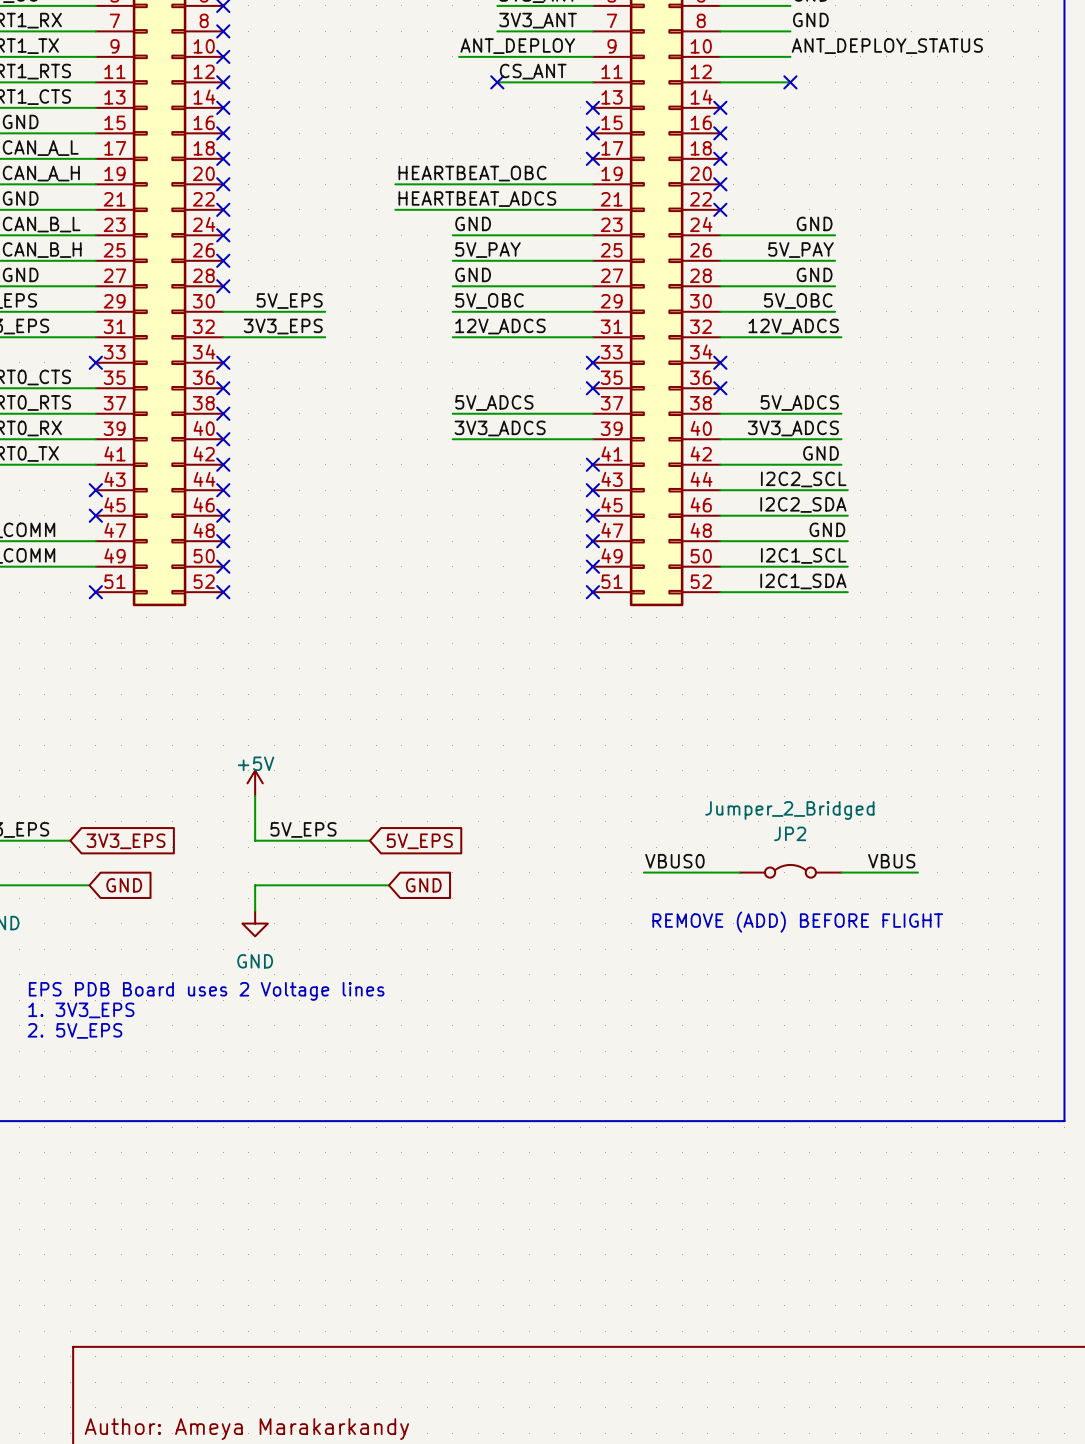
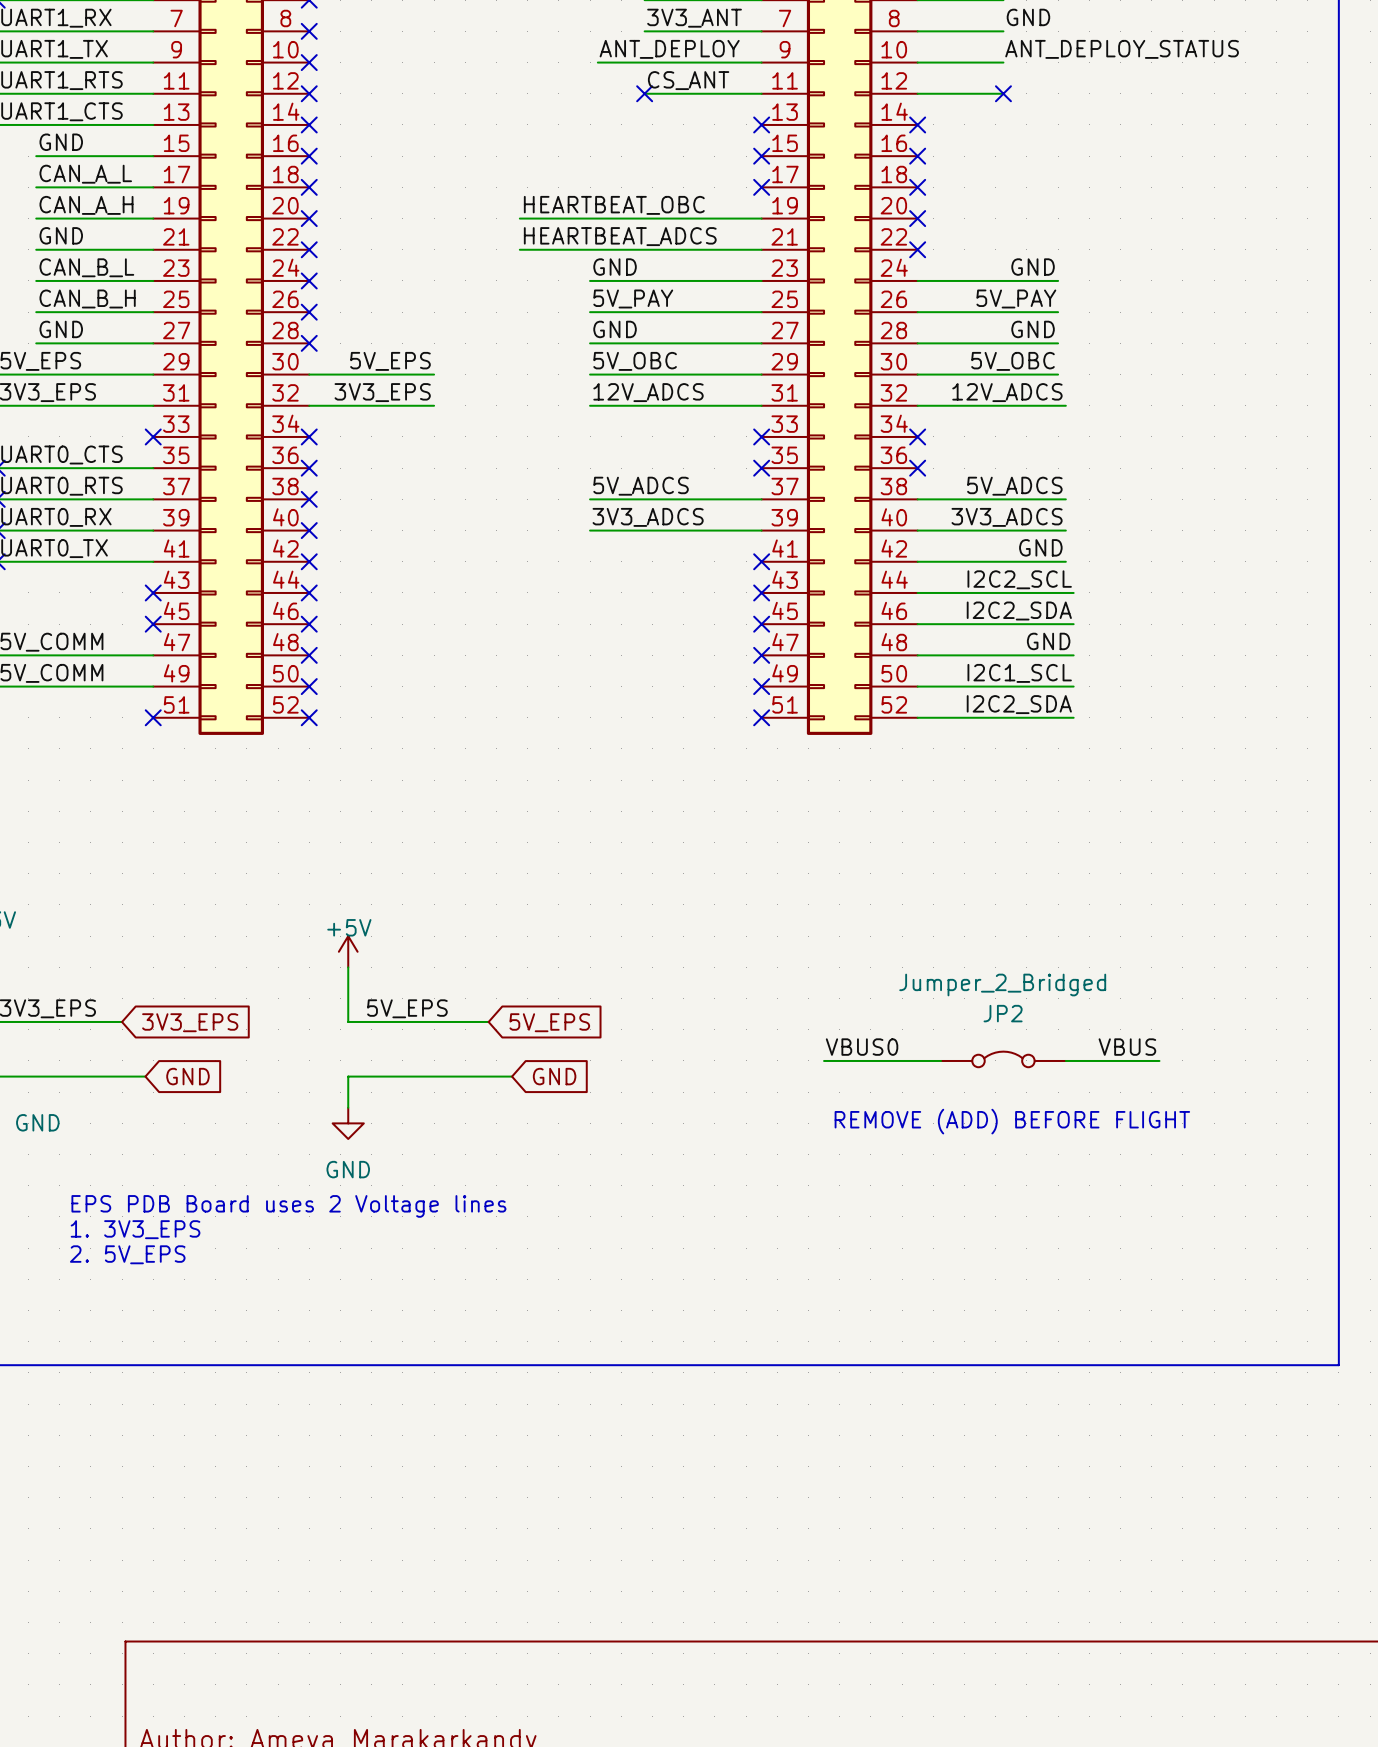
label: I2C1_SDA (803, 581) -> I2C2_SDA (1019, 704)

